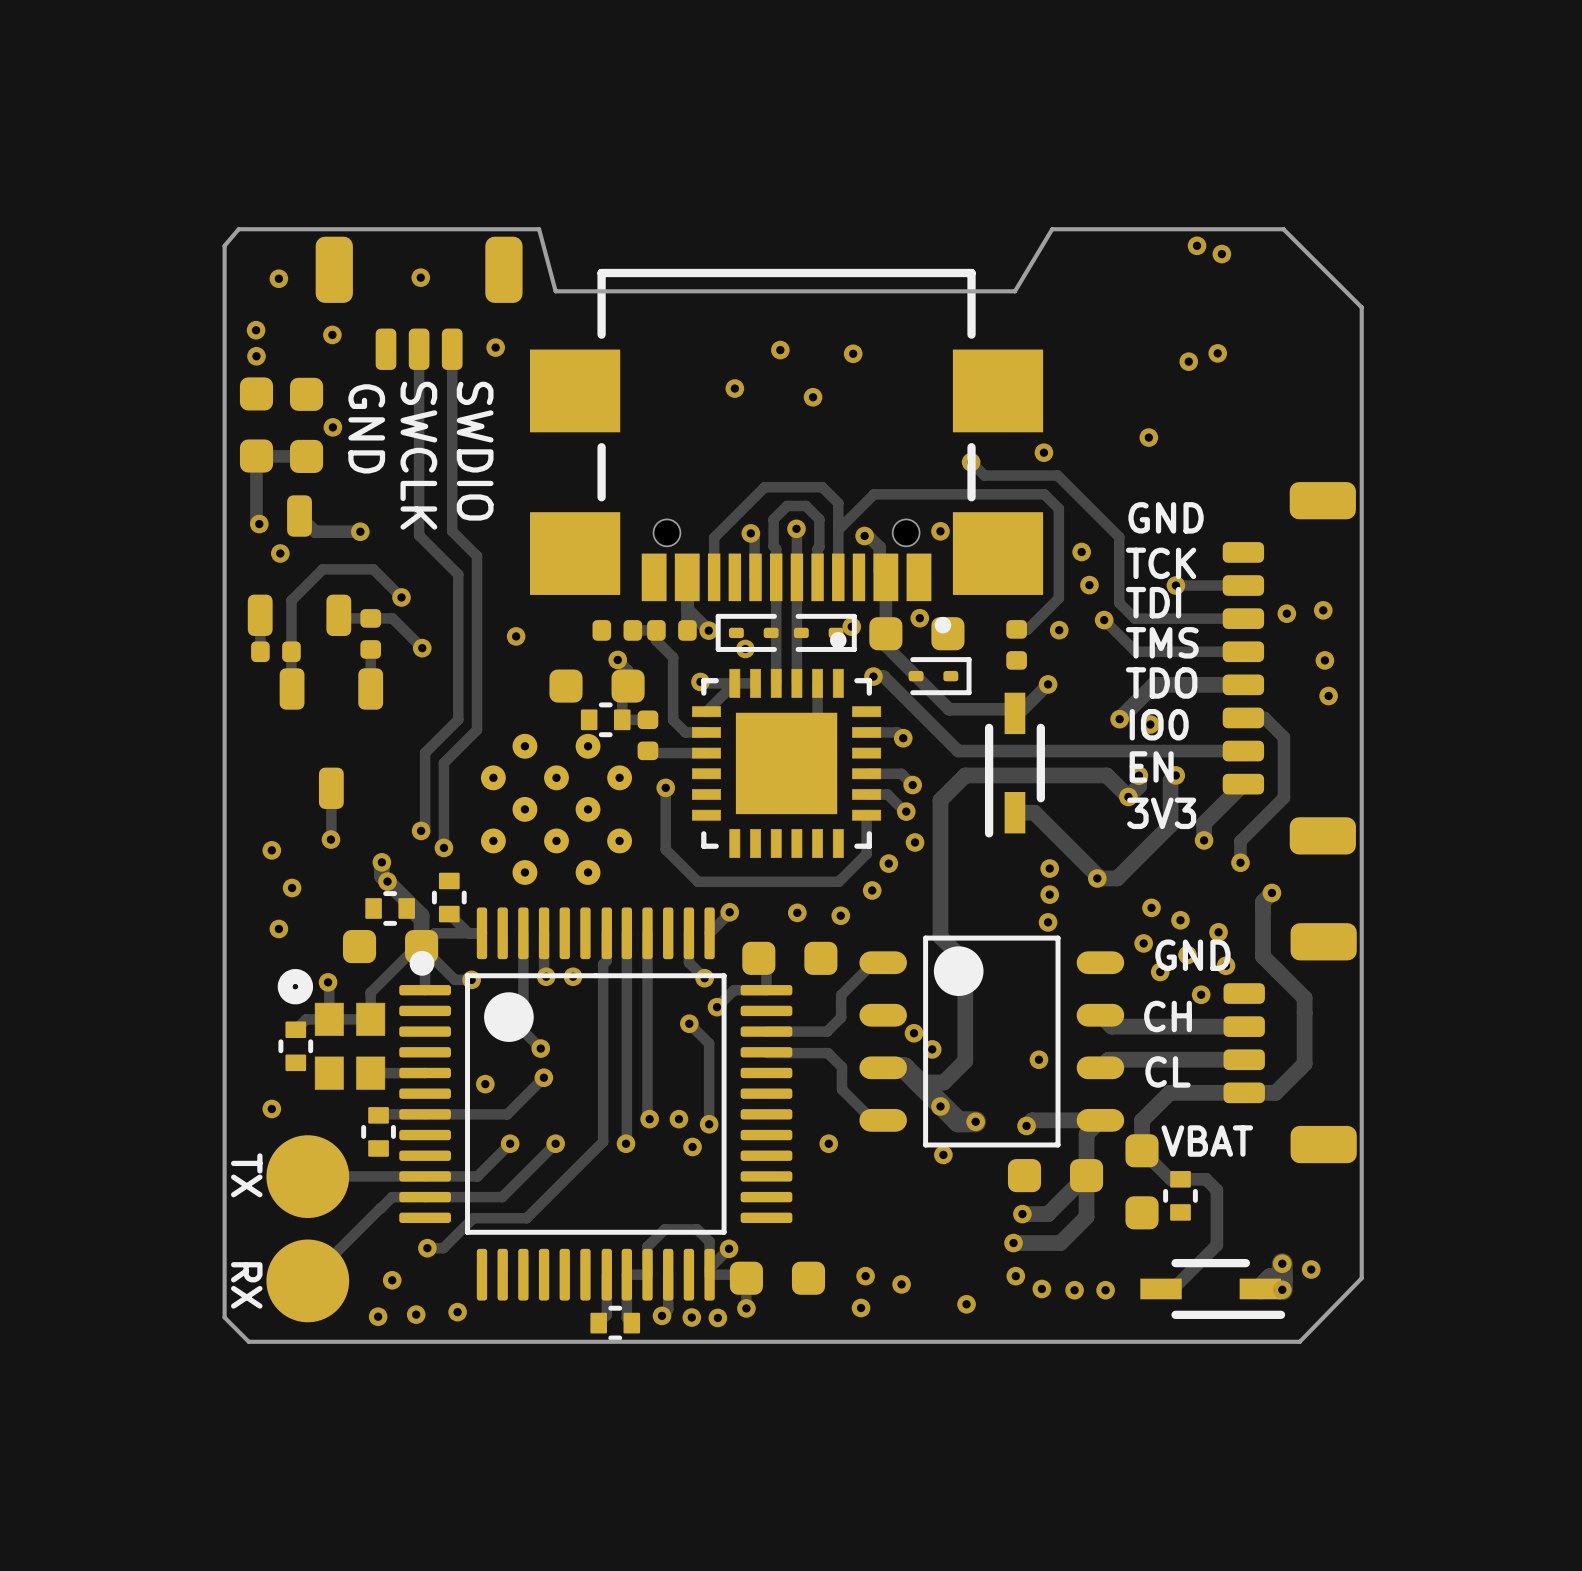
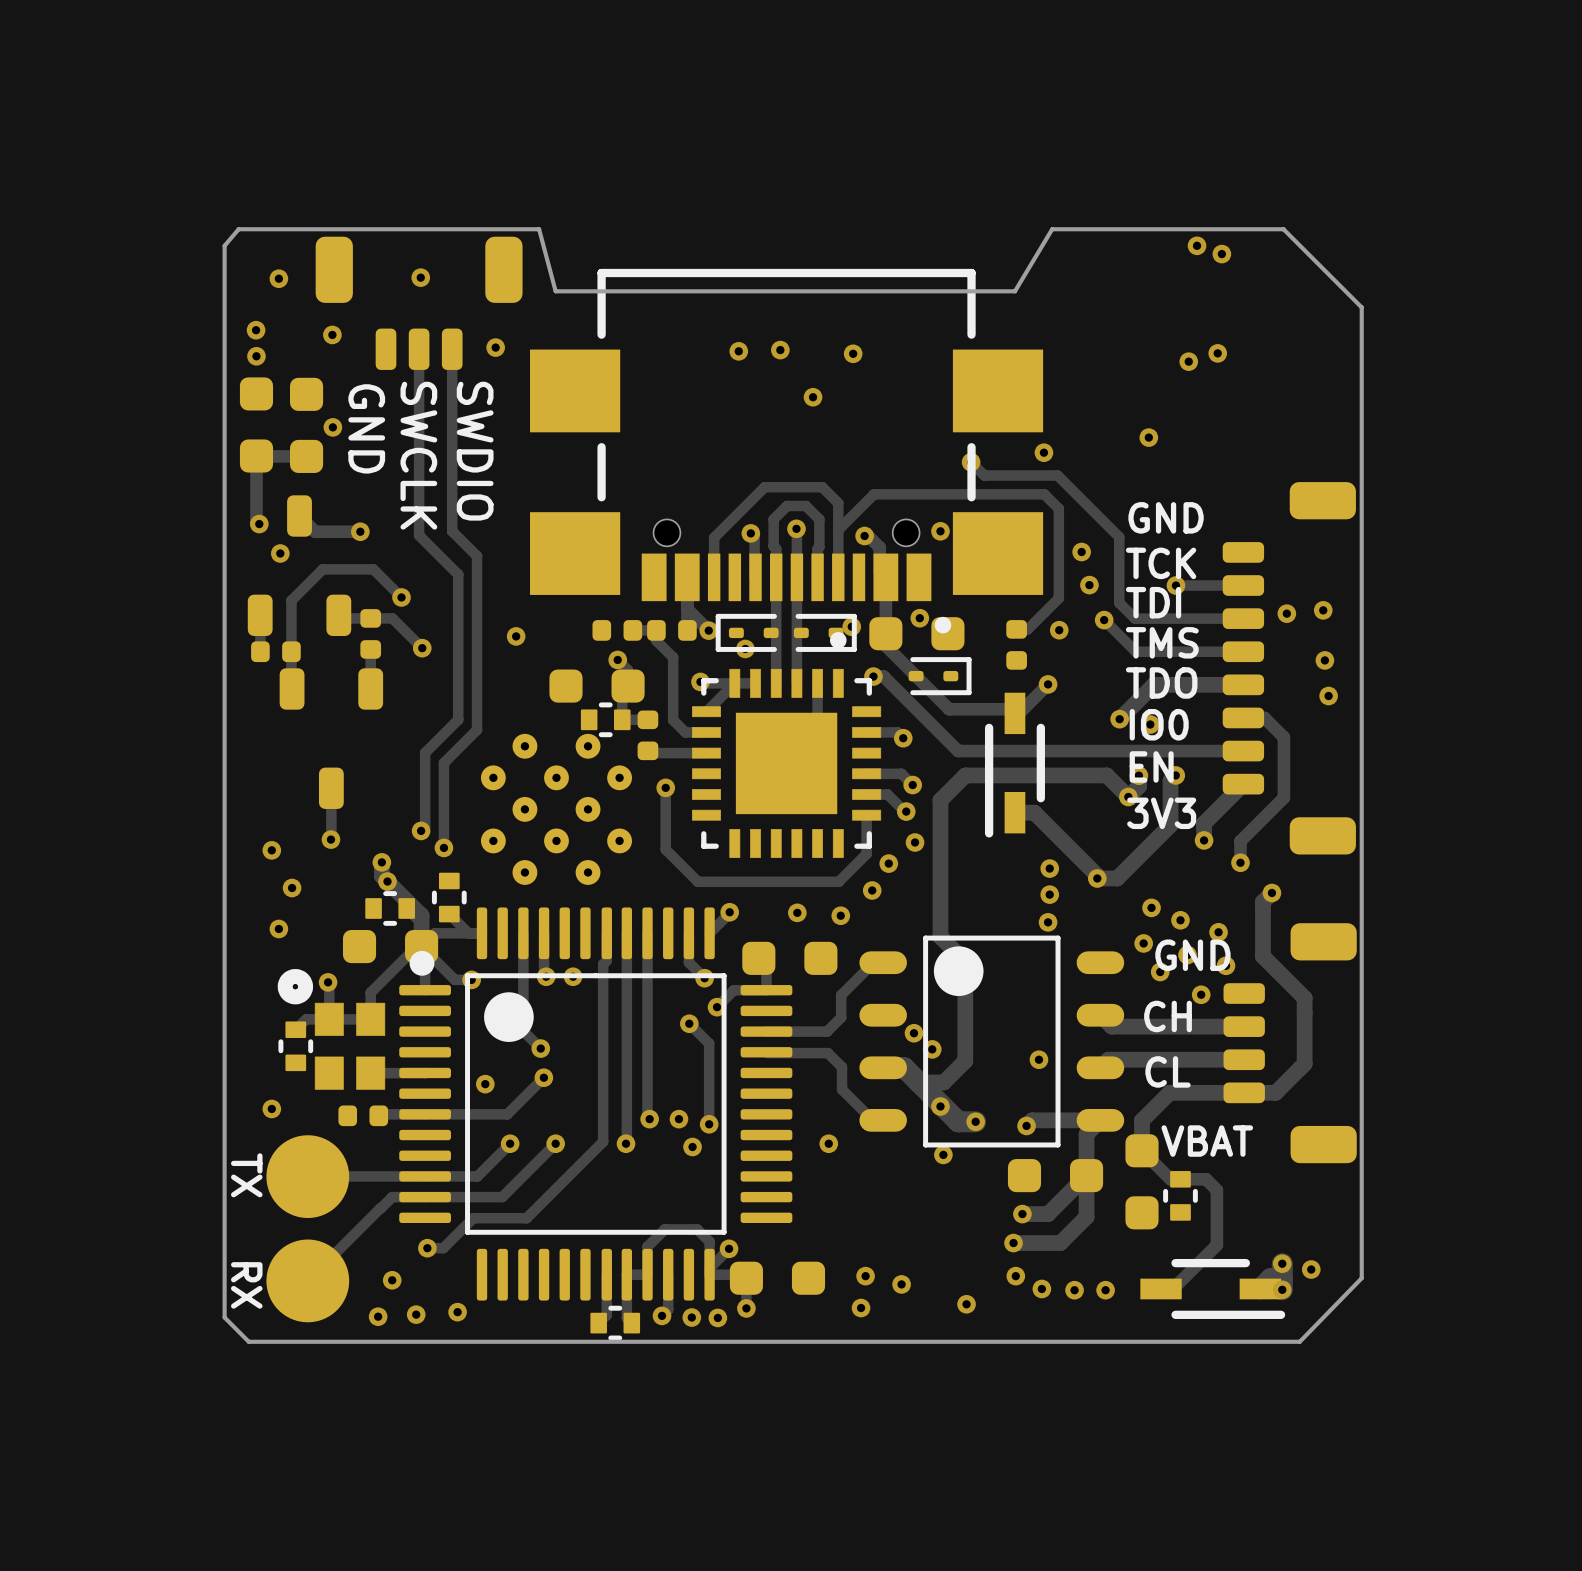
via position: (734, 388) -> (738, 351)
part footprint: [361, 1107, 396, 1157] -> [338, 1105, 389, 1127]

